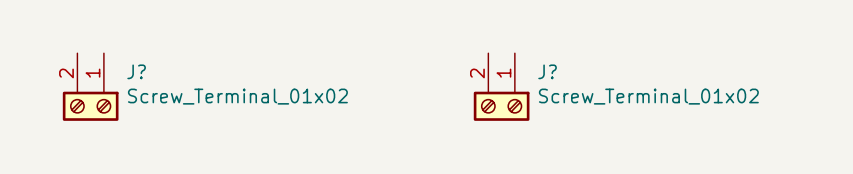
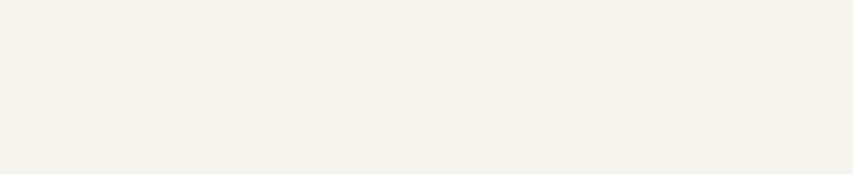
J?: Screw_Terminal_01x02 (90, 87) -> none
J?: Screw_Terminal_01x02 (501, 87) -> none

